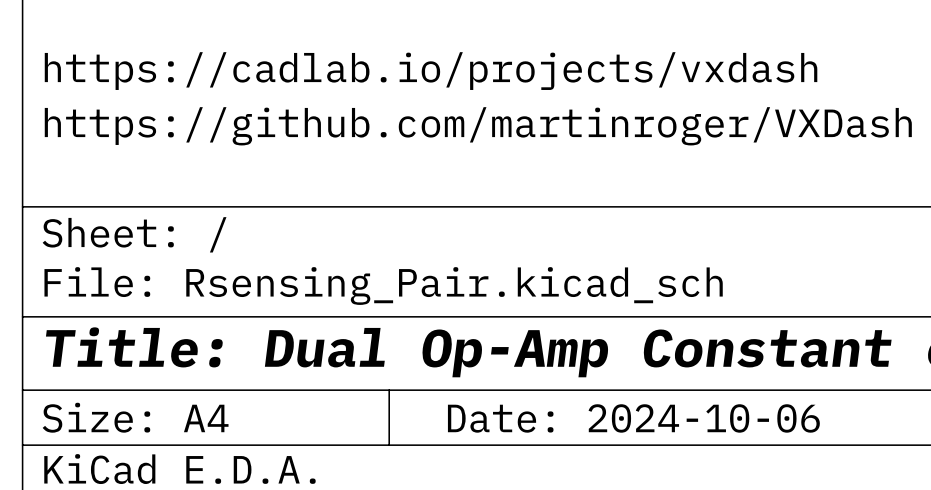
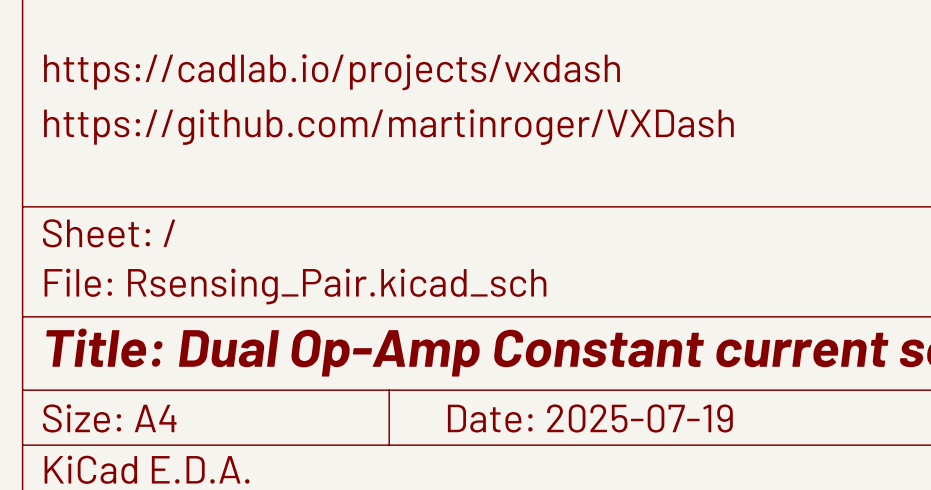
title block: Date: 2024-10-06 (633, 418) -> Date: 2025-07-19 (590, 418)

